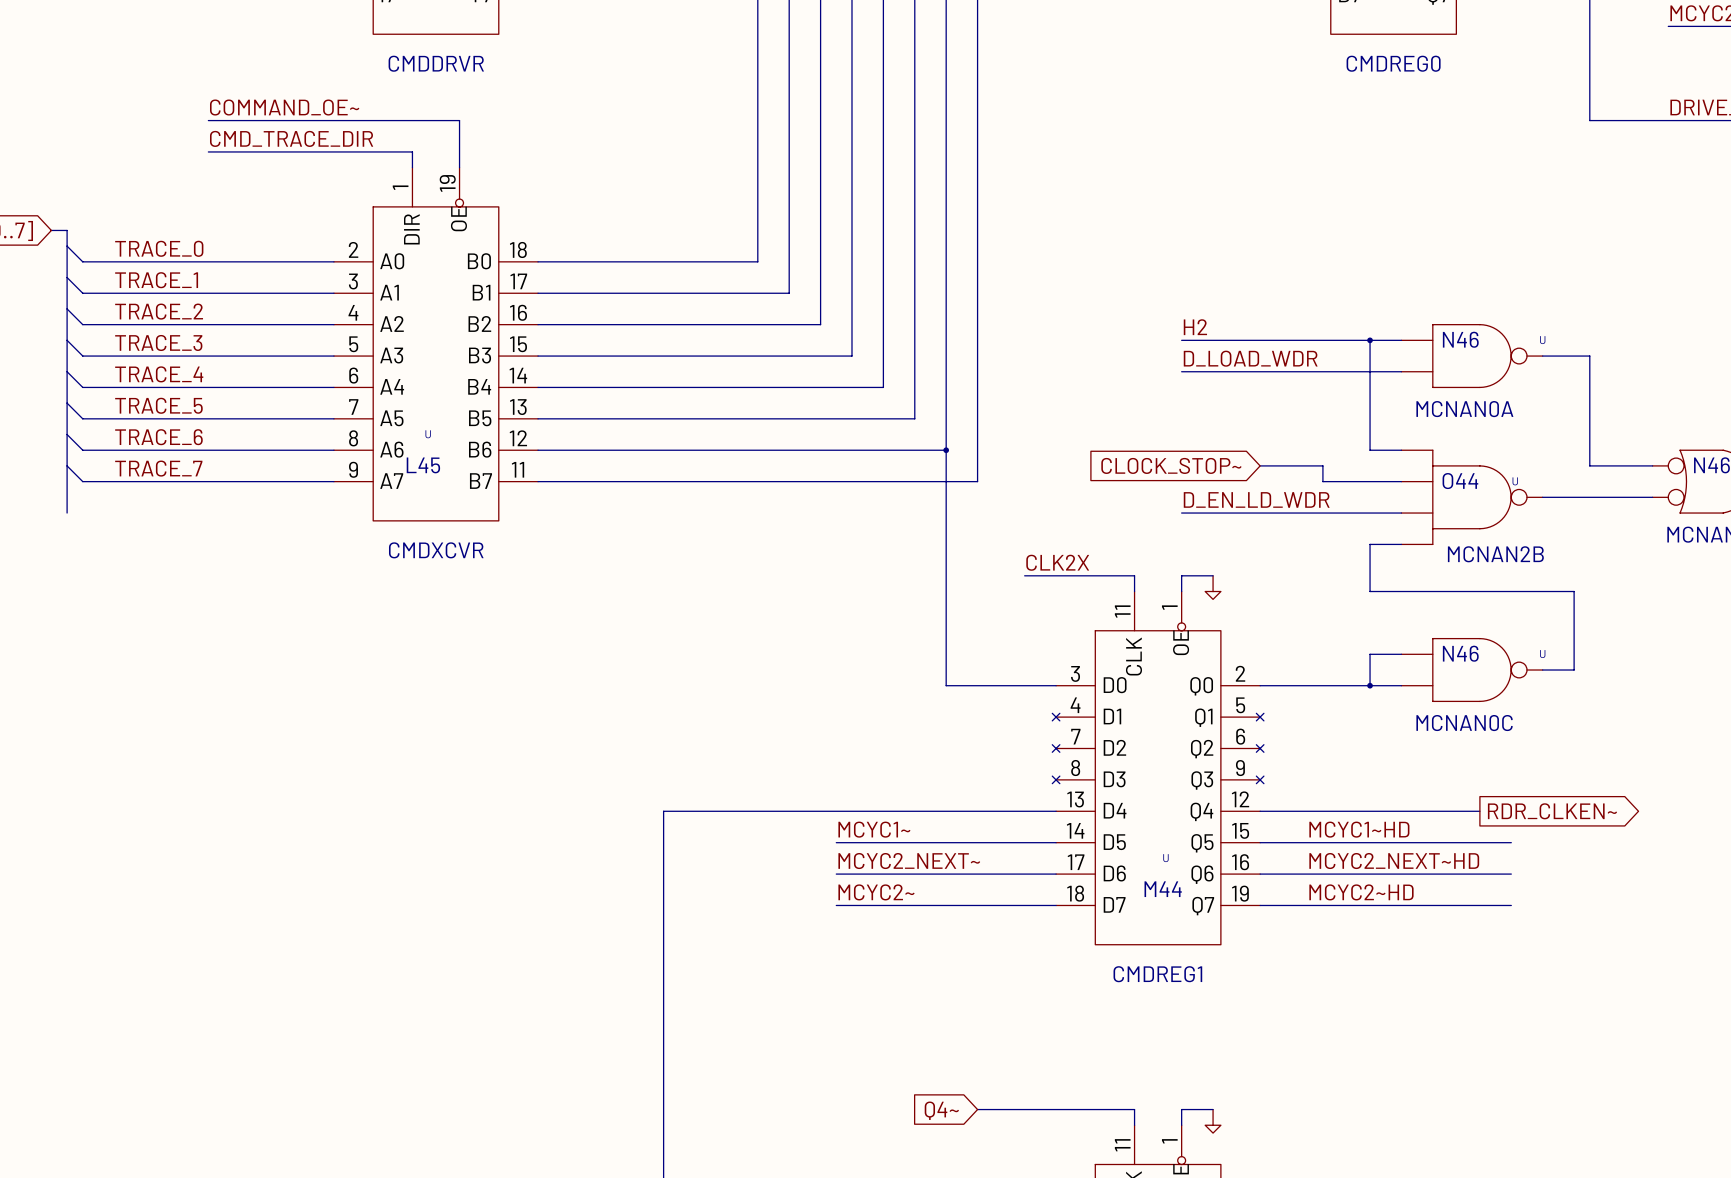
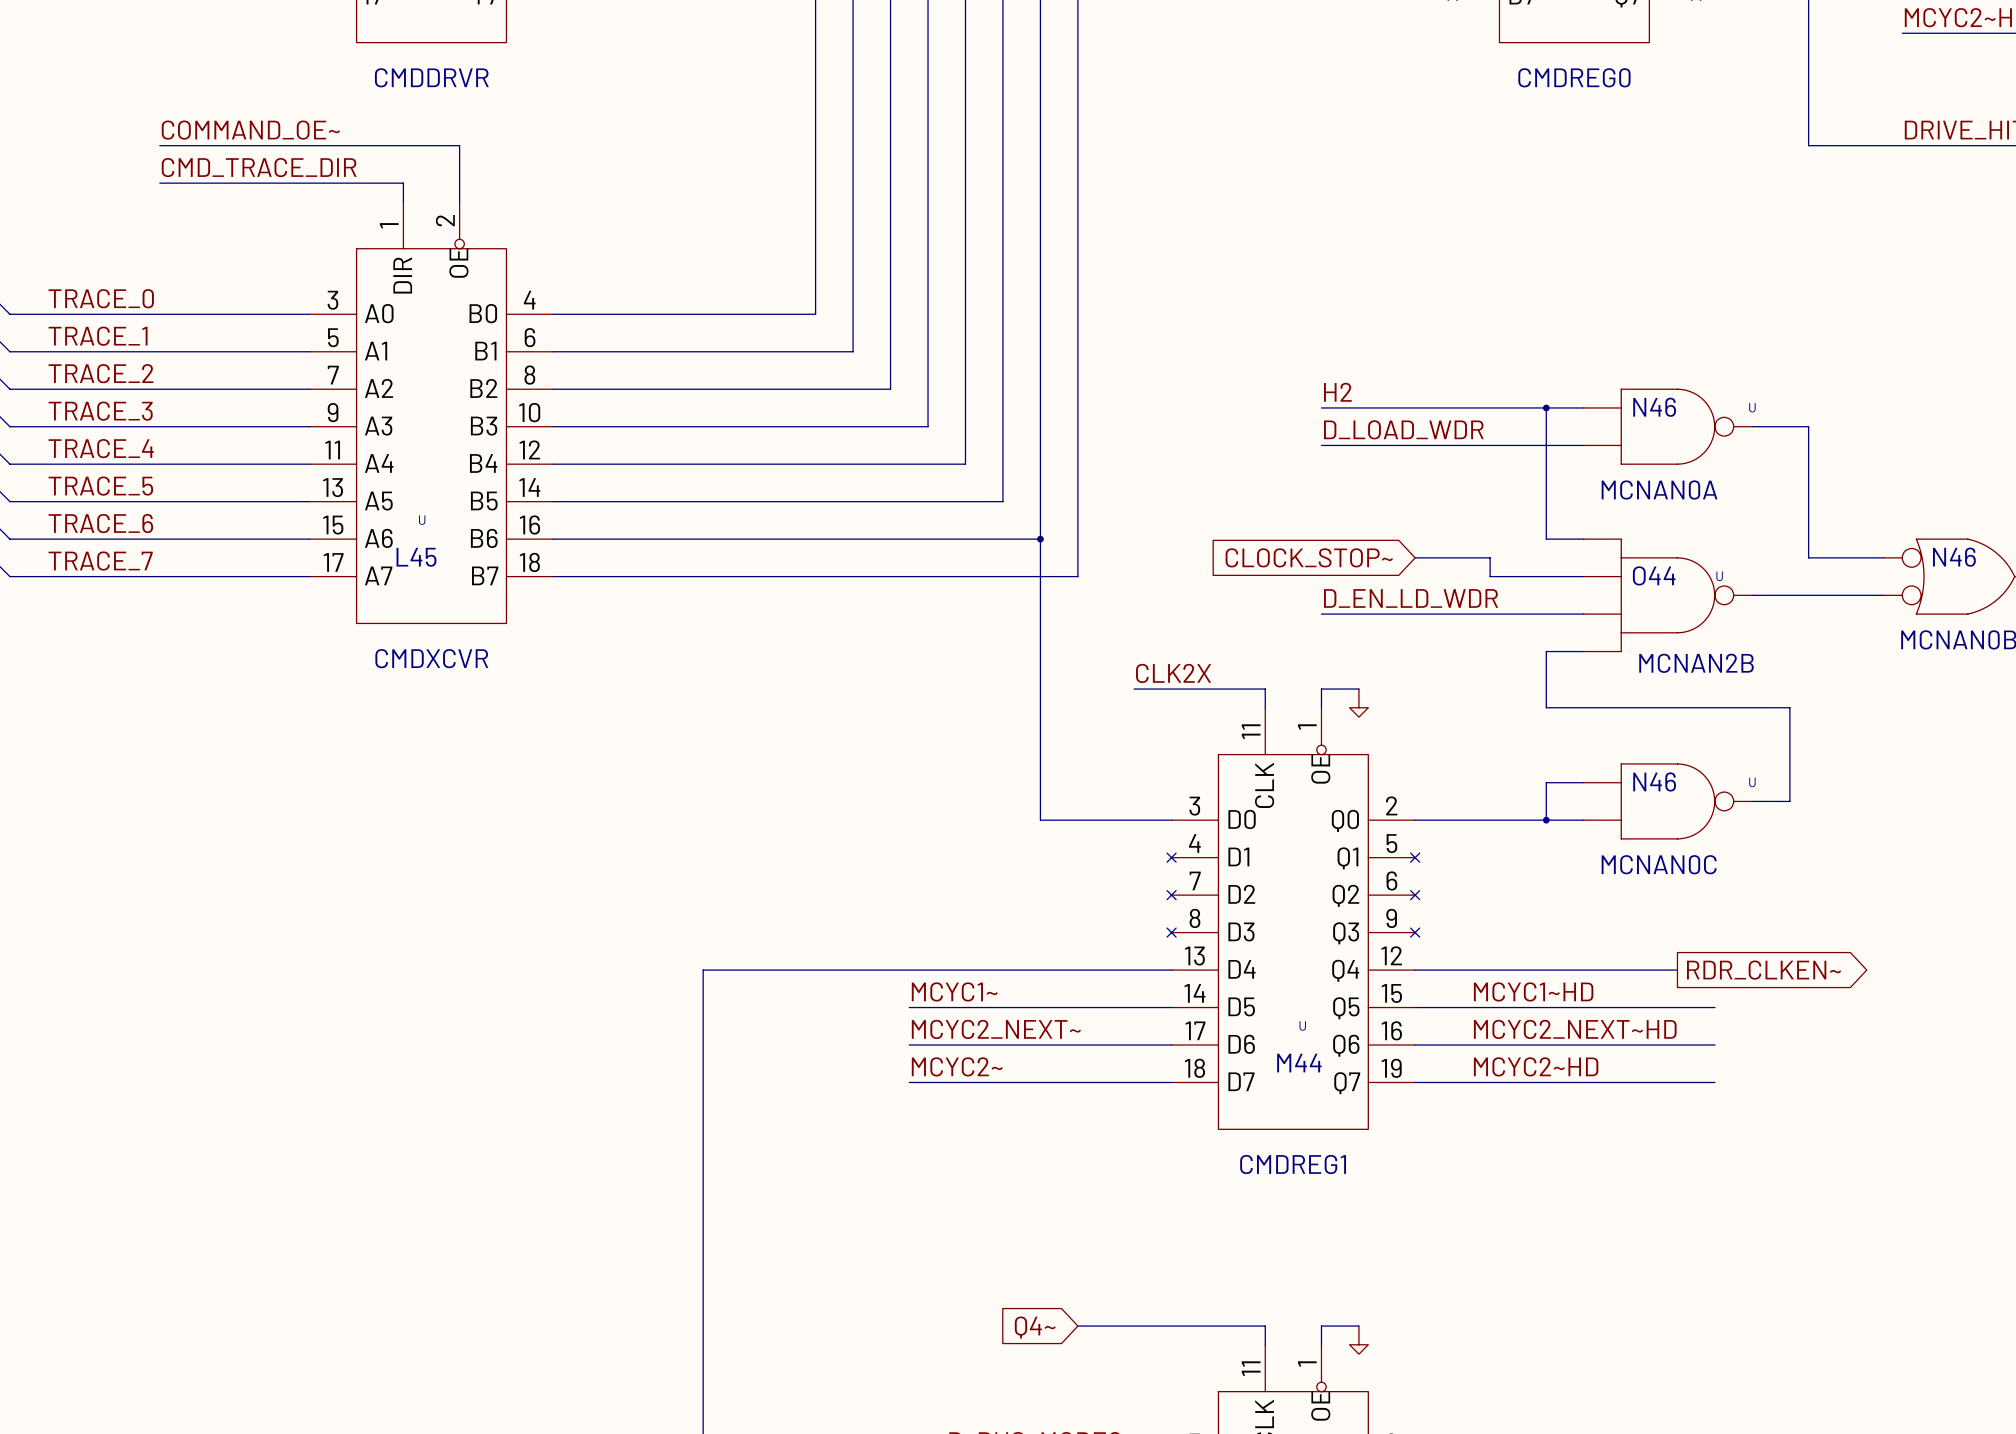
U symbol: [333, 167, 539, 521] -> [309, 201, 554, 624]

